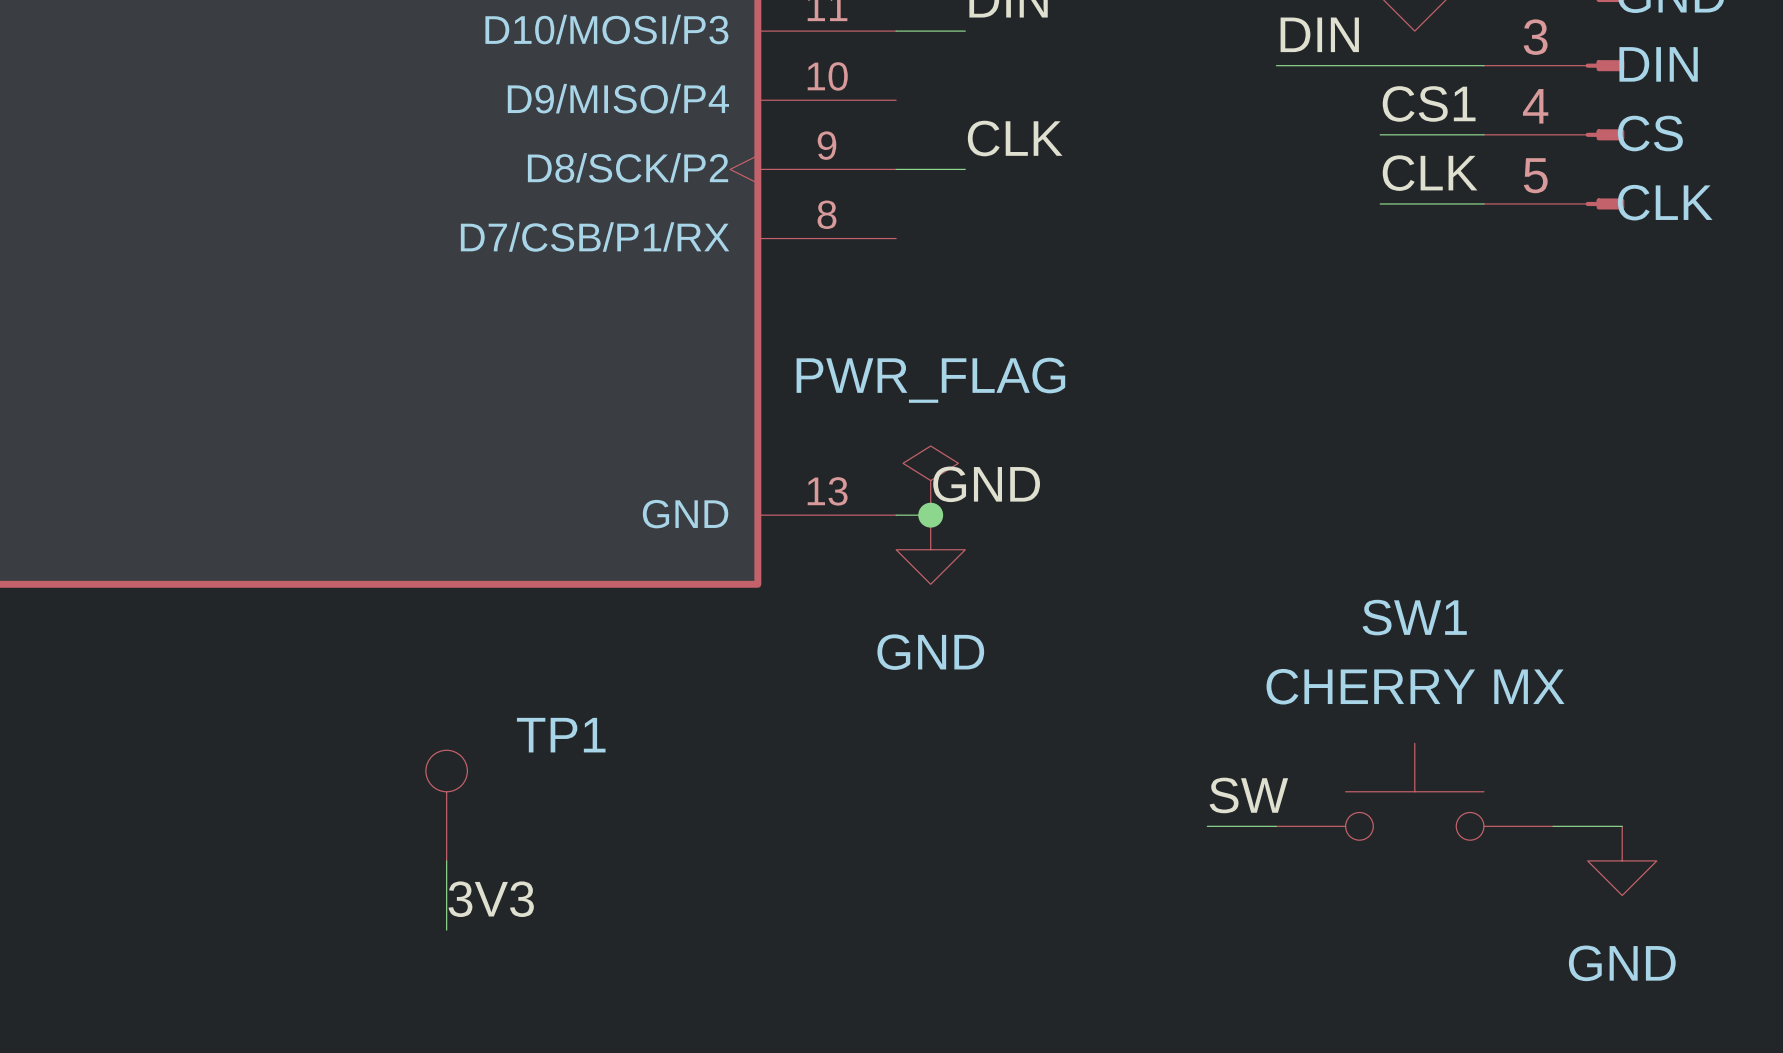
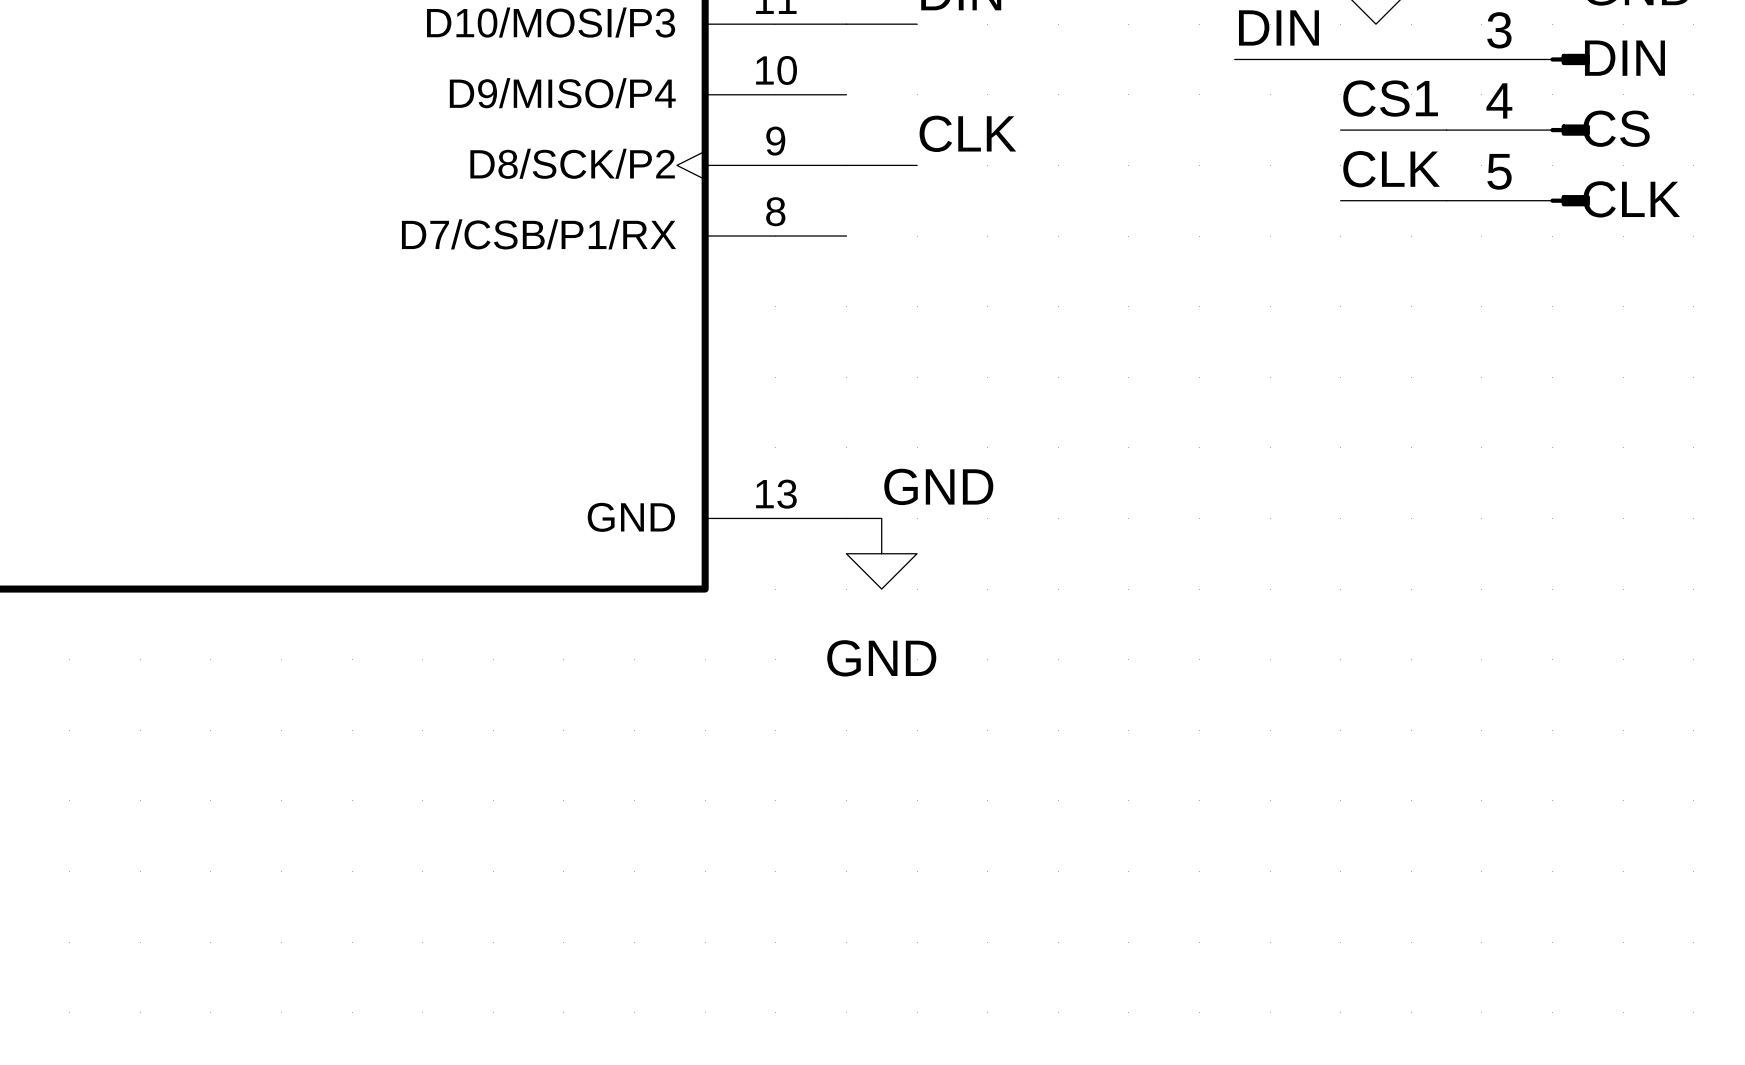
power symbol: PWR_FLAG (930, 480) -> none
junction: (930, 515) -> none
SW1: CHERRY MX (1414, 791) -> none
label: SW (1248, 795) -> none
TP1: (446, 805) -> none
wire: (1207, 826) (1276, 826) -> none
wire: (1553, 826) (1622, 826) -> none
wire: (446, 860) (446, 930) -> none
power symbol: GND (1622, 860) -> none
label: 3V3 (491, 899) -> none

